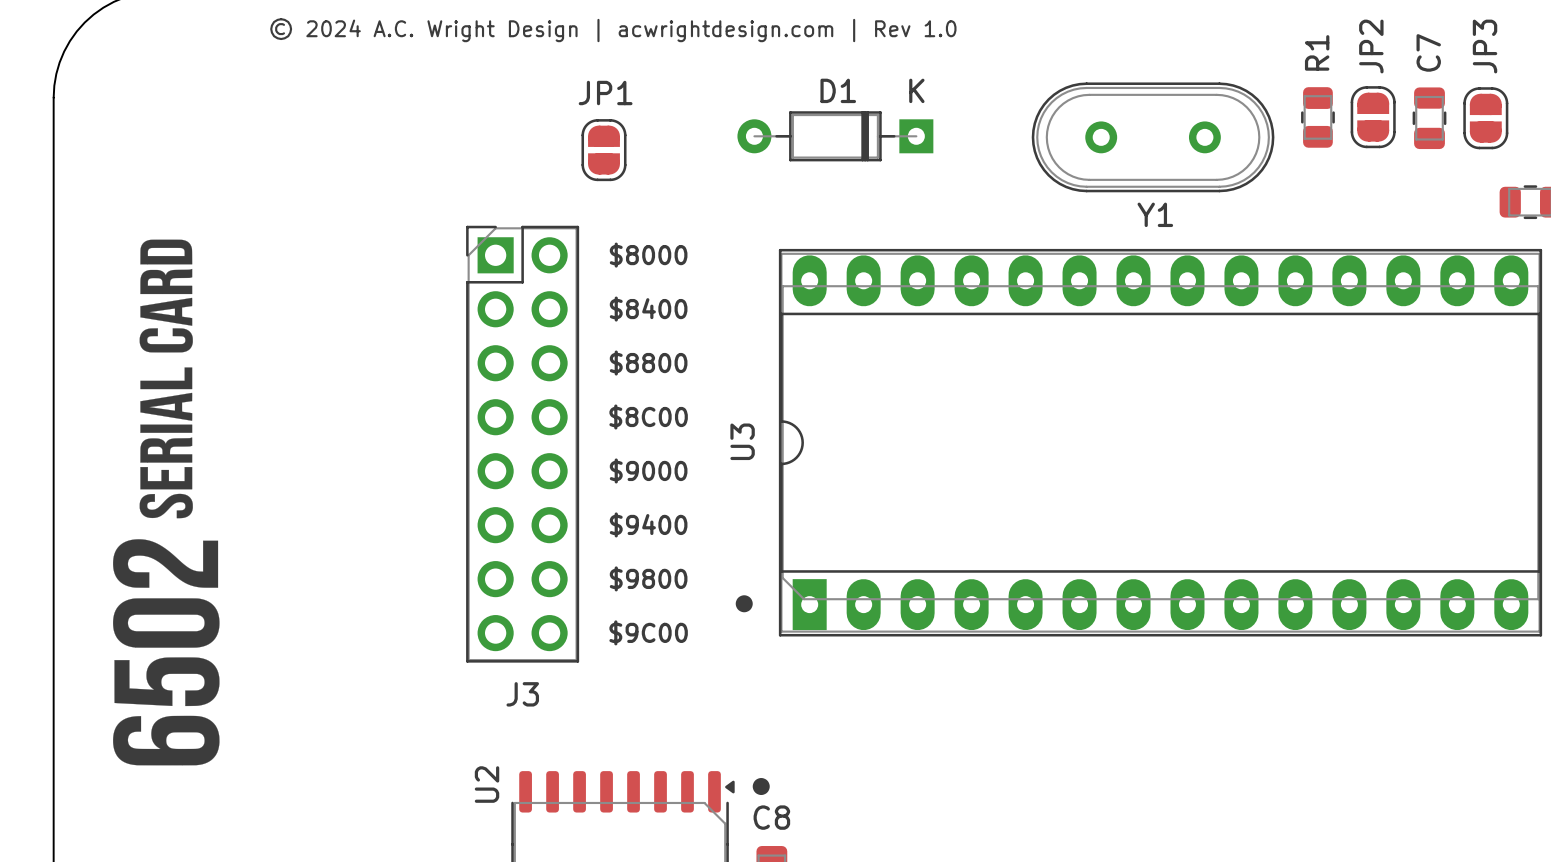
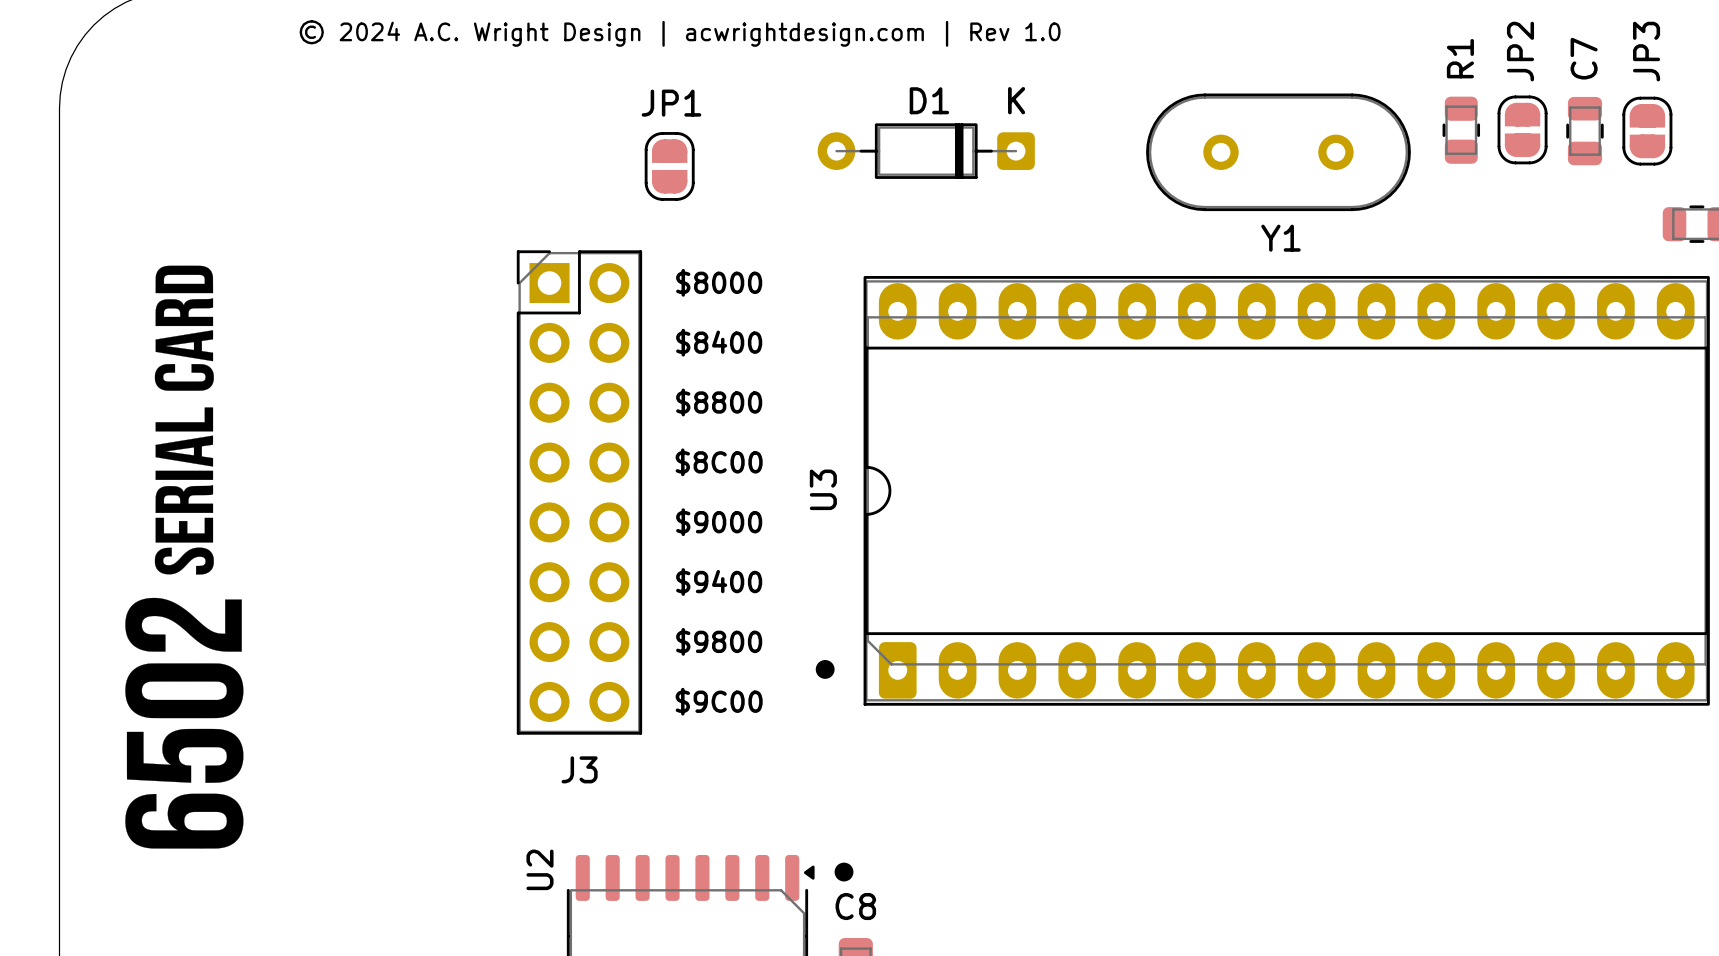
Y1 footprint: [1031, 82, 1275, 193] -> [1146, 93, 1411, 212]
D1 footprint: [737, 111, 934, 162] -> [817, 123, 1035, 179]
U3 footprint: [778, 248, 1543, 637] -> [863, 275, 1710, 706]

